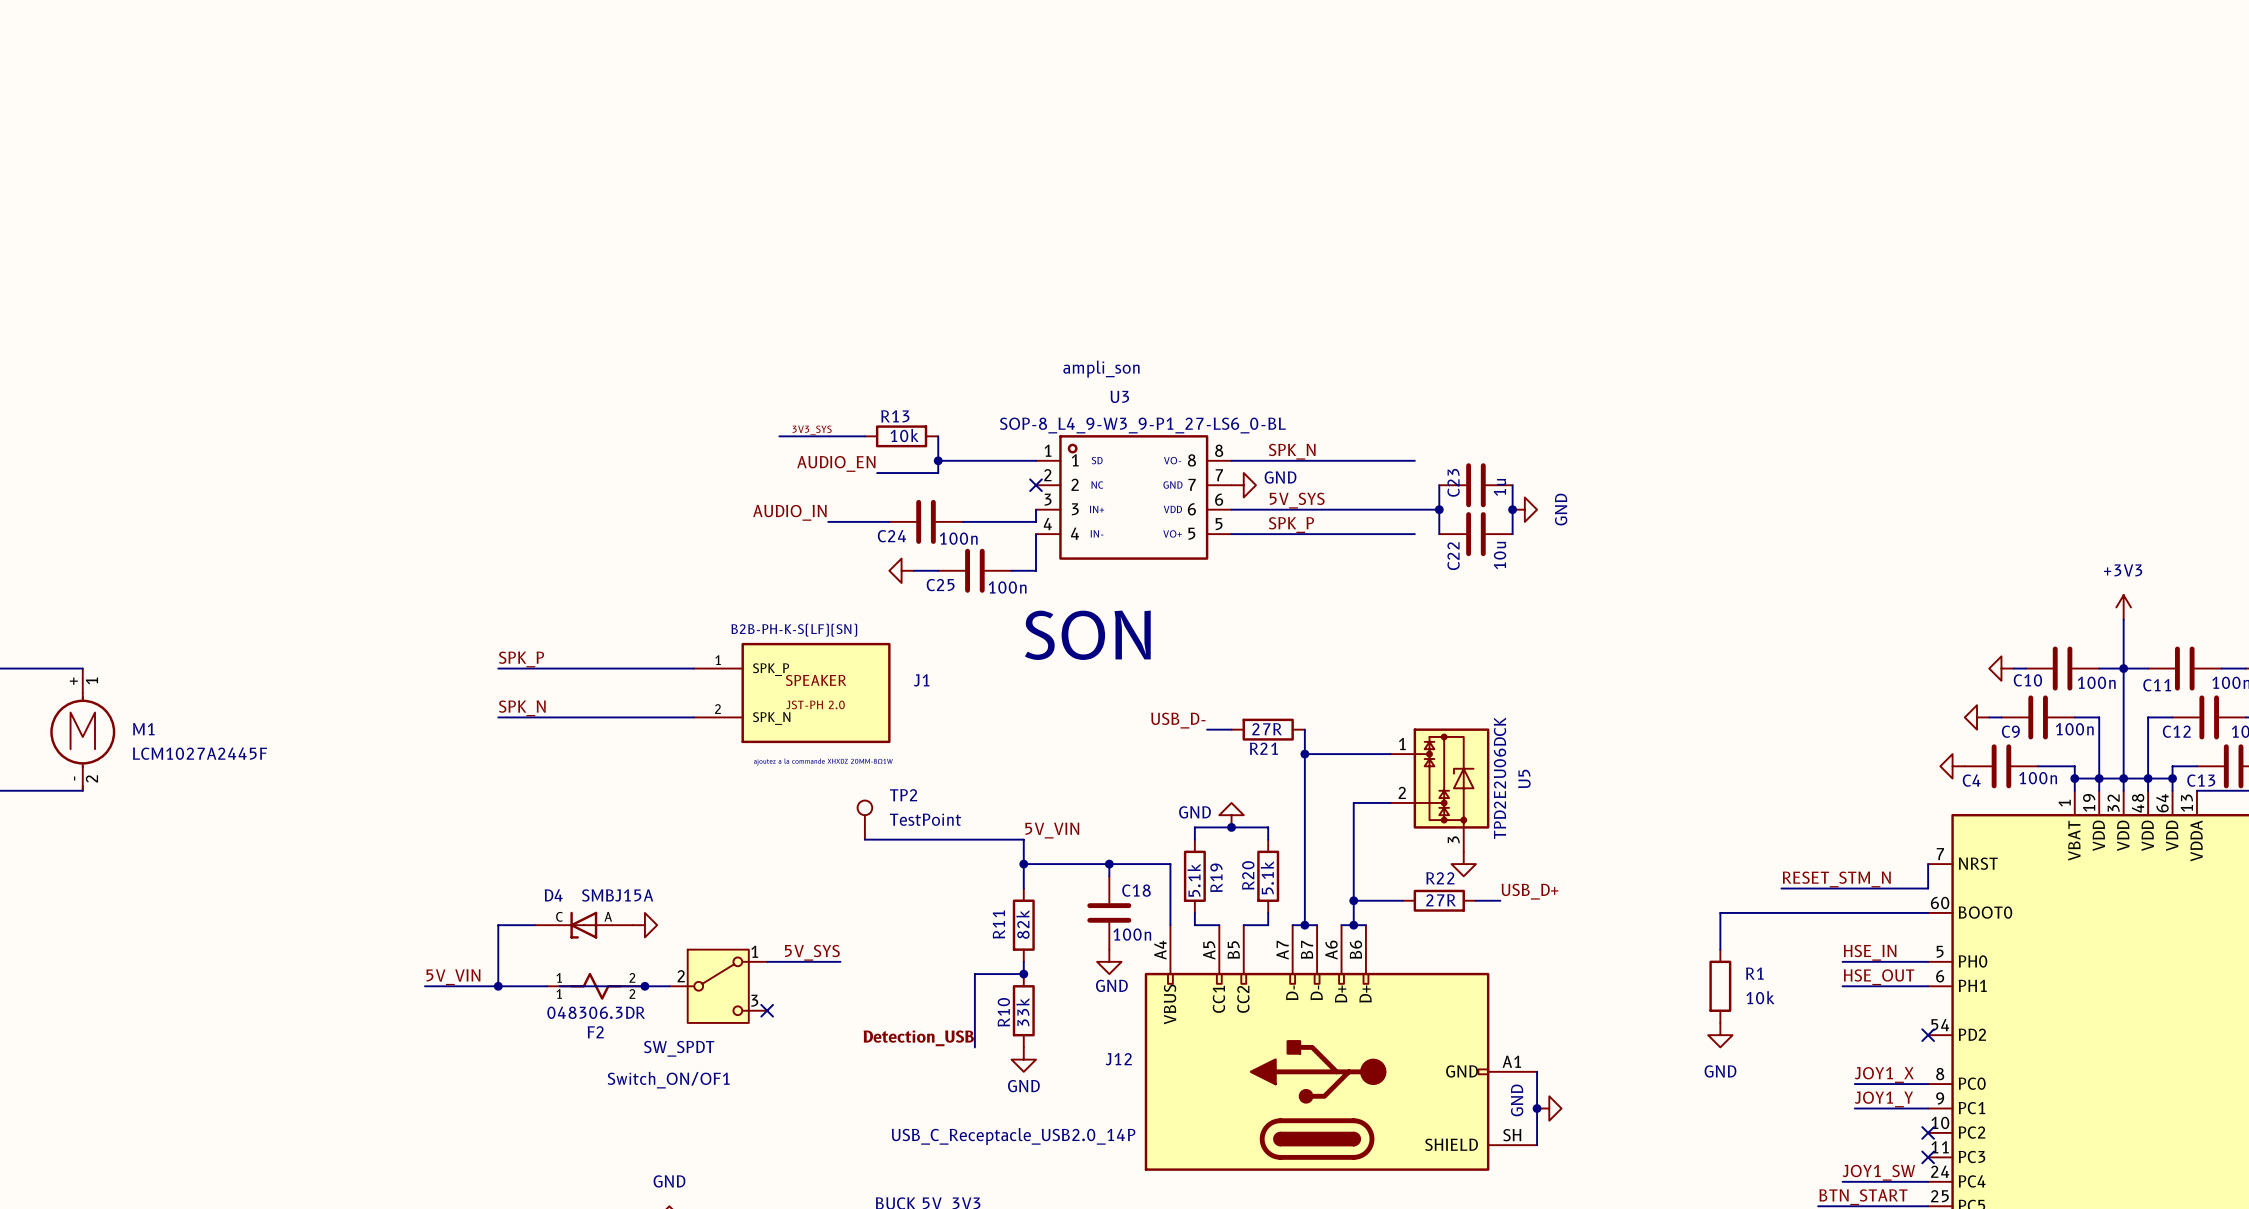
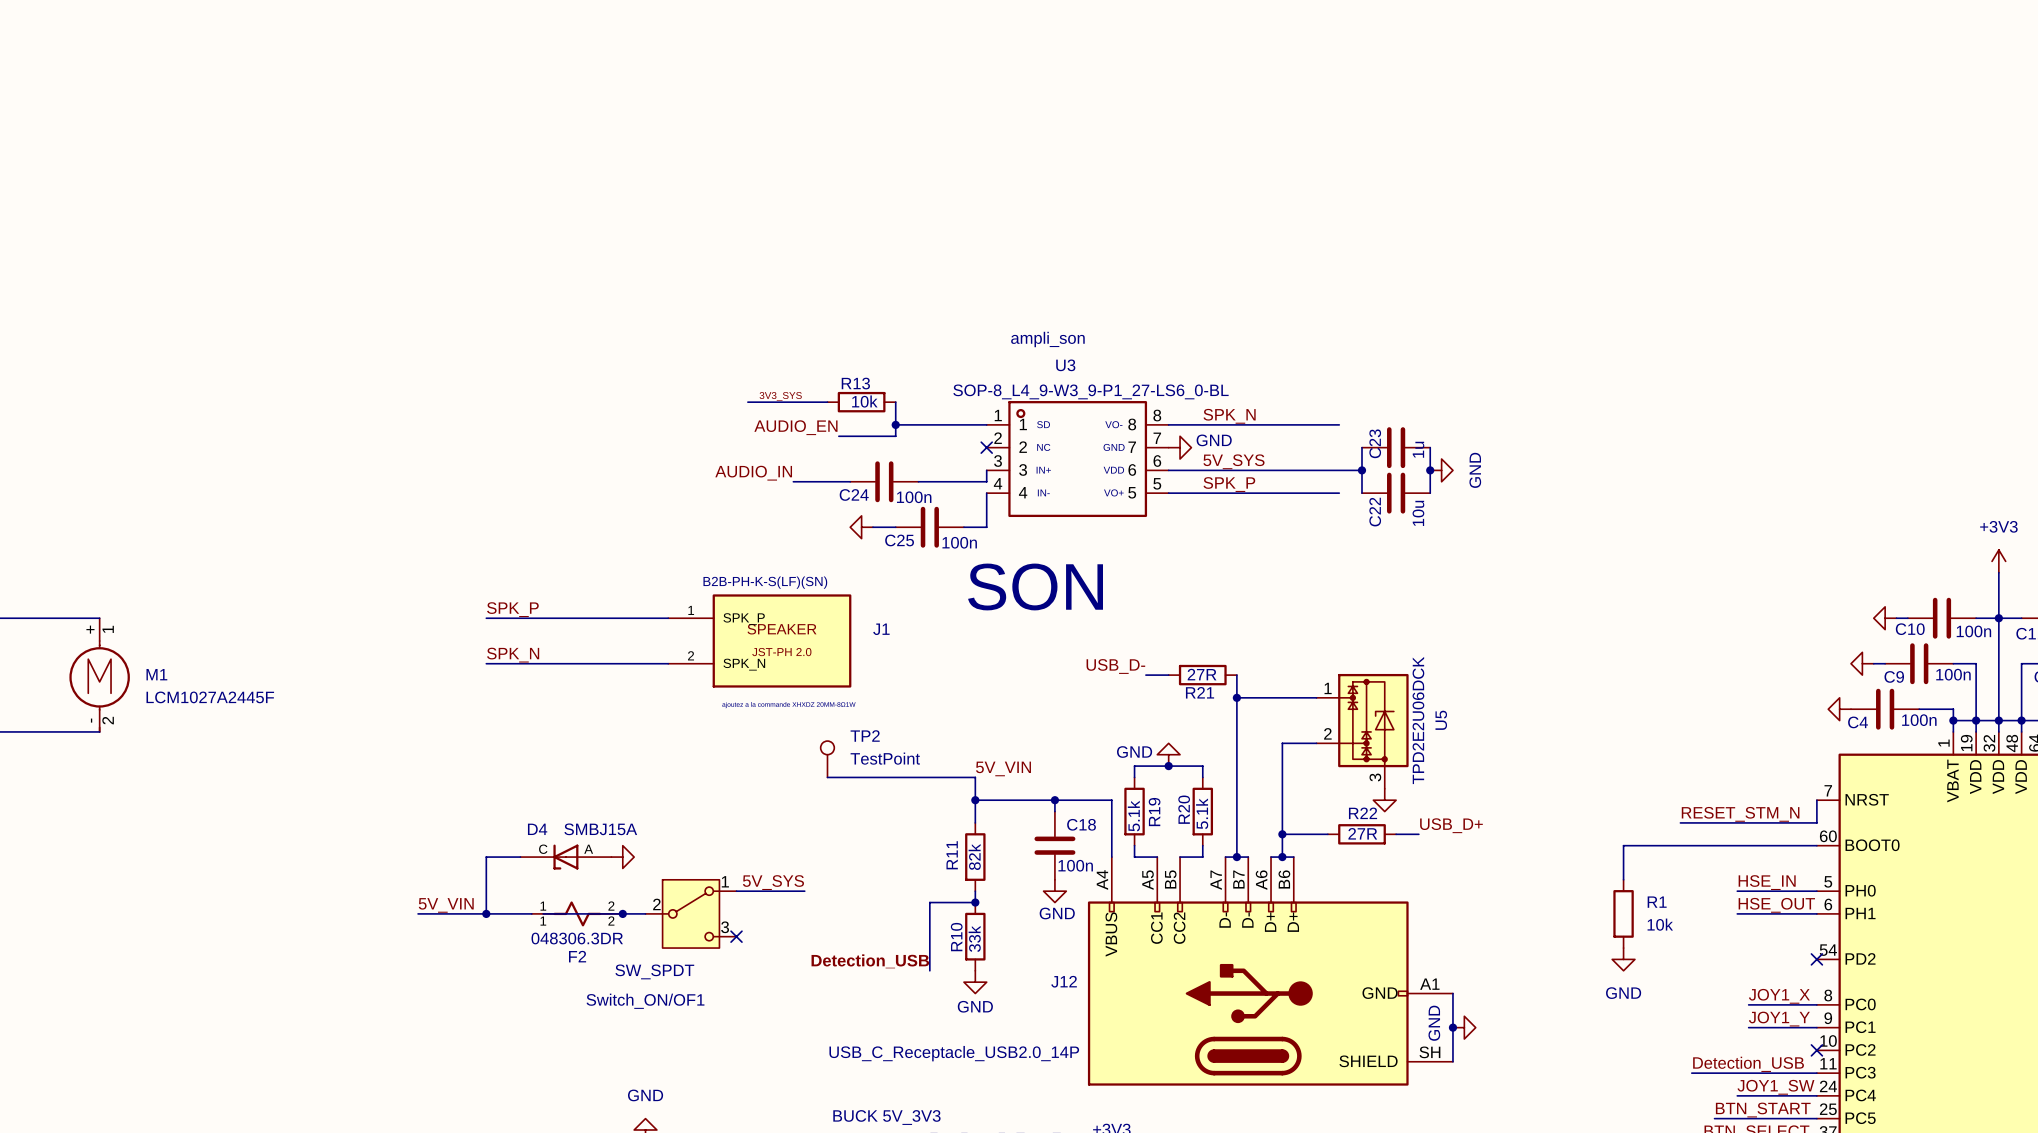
label: none -> Detection_USB (1748, 1064)
wire: none -> (1691, 1073) (1816, 1073)
no-connect mark: (1928, 1157) -> none

